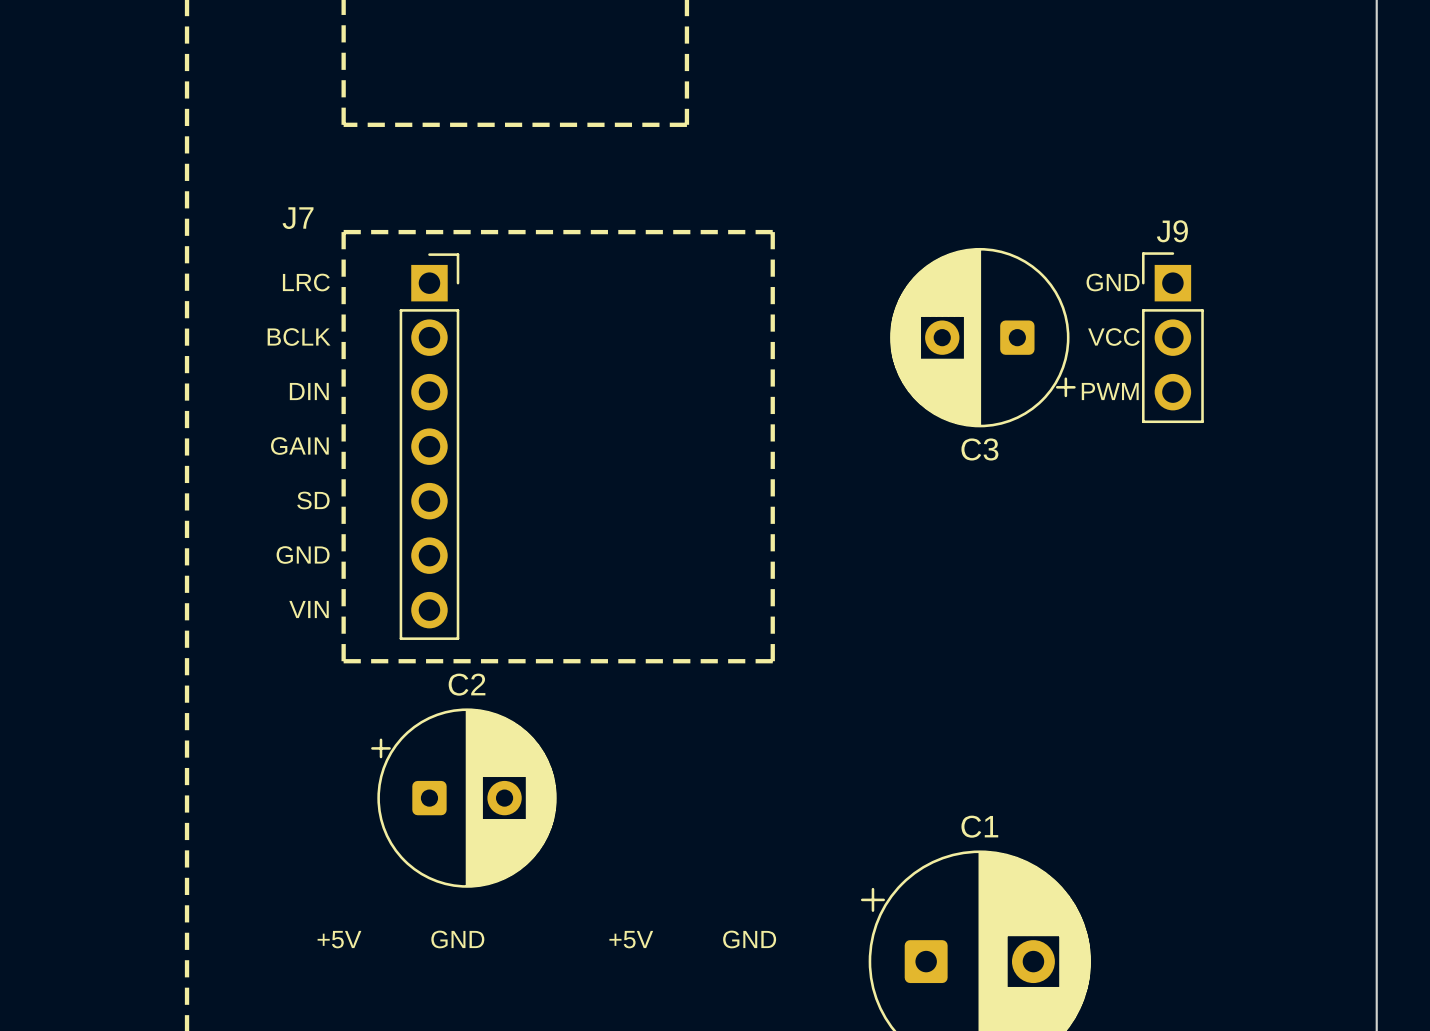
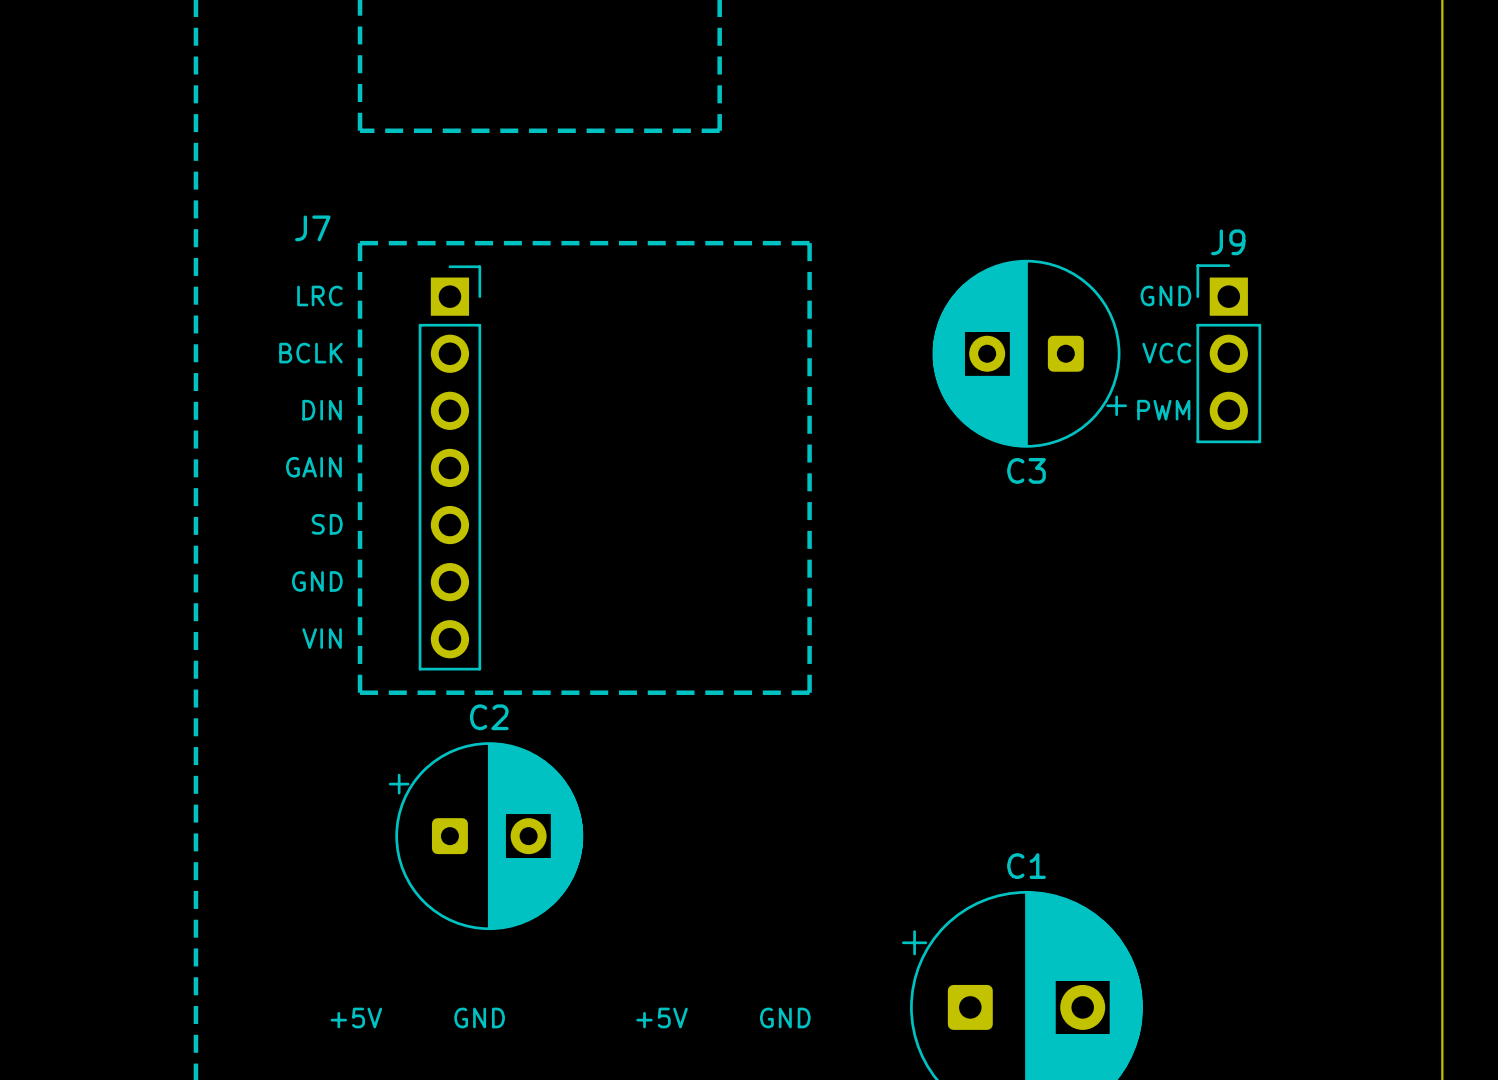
text position: +5V (339, 939) -> +5V (356, 1017)
text position: GND (457, 939) -> GND (479, 1017)
text position: +5V (631, 939) -> +5V (662, 1017)
text position: GND (749, 939) -> GND (785, 1017)

